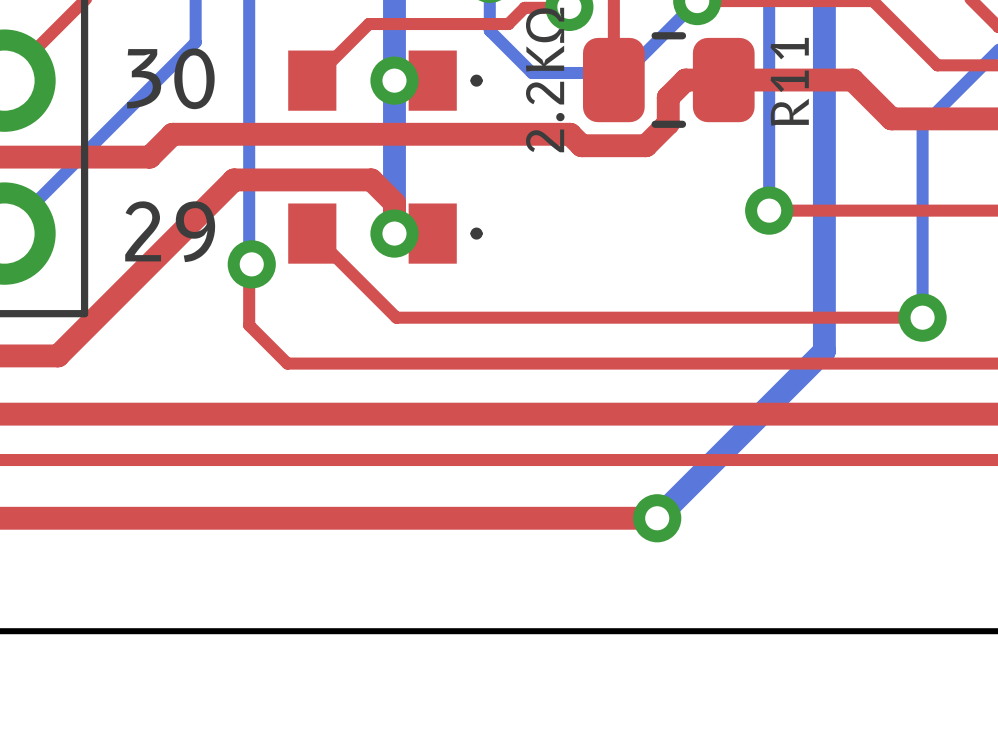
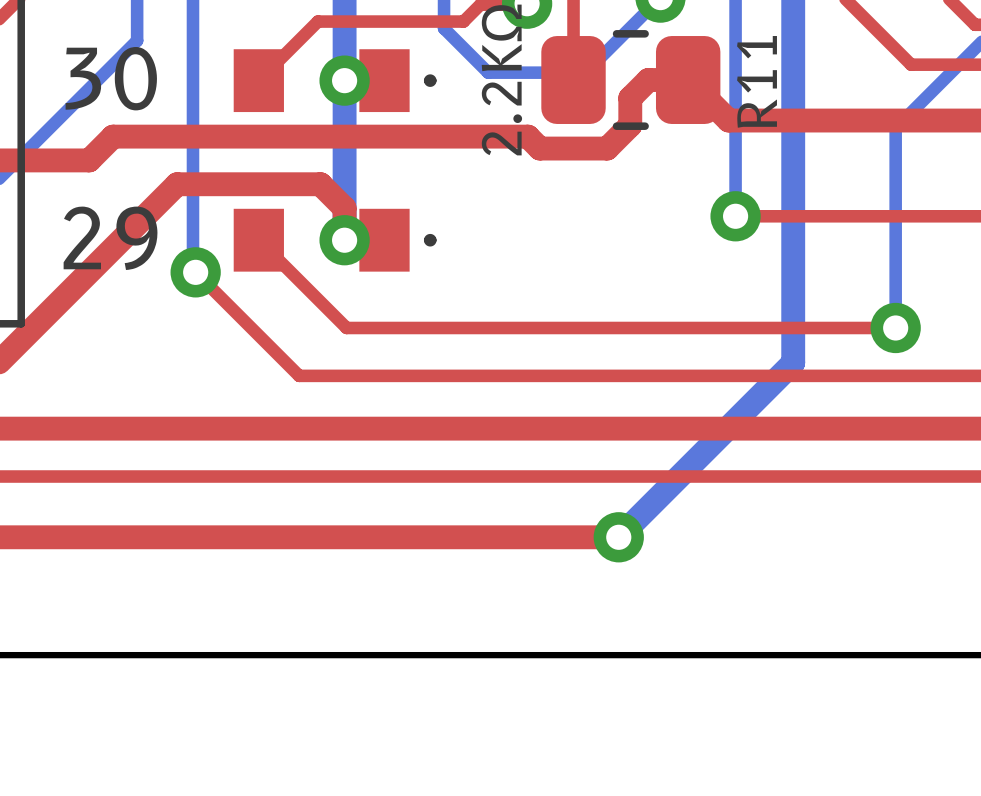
top track: (723, 80) (852, 80) (891, 118) -> (688, 80) (728, 120) (863, 120)
top track: (251, 264) (249, 266) (249, 325) (287, 363) (350, 363) -> (195, 272) (299, 375)

